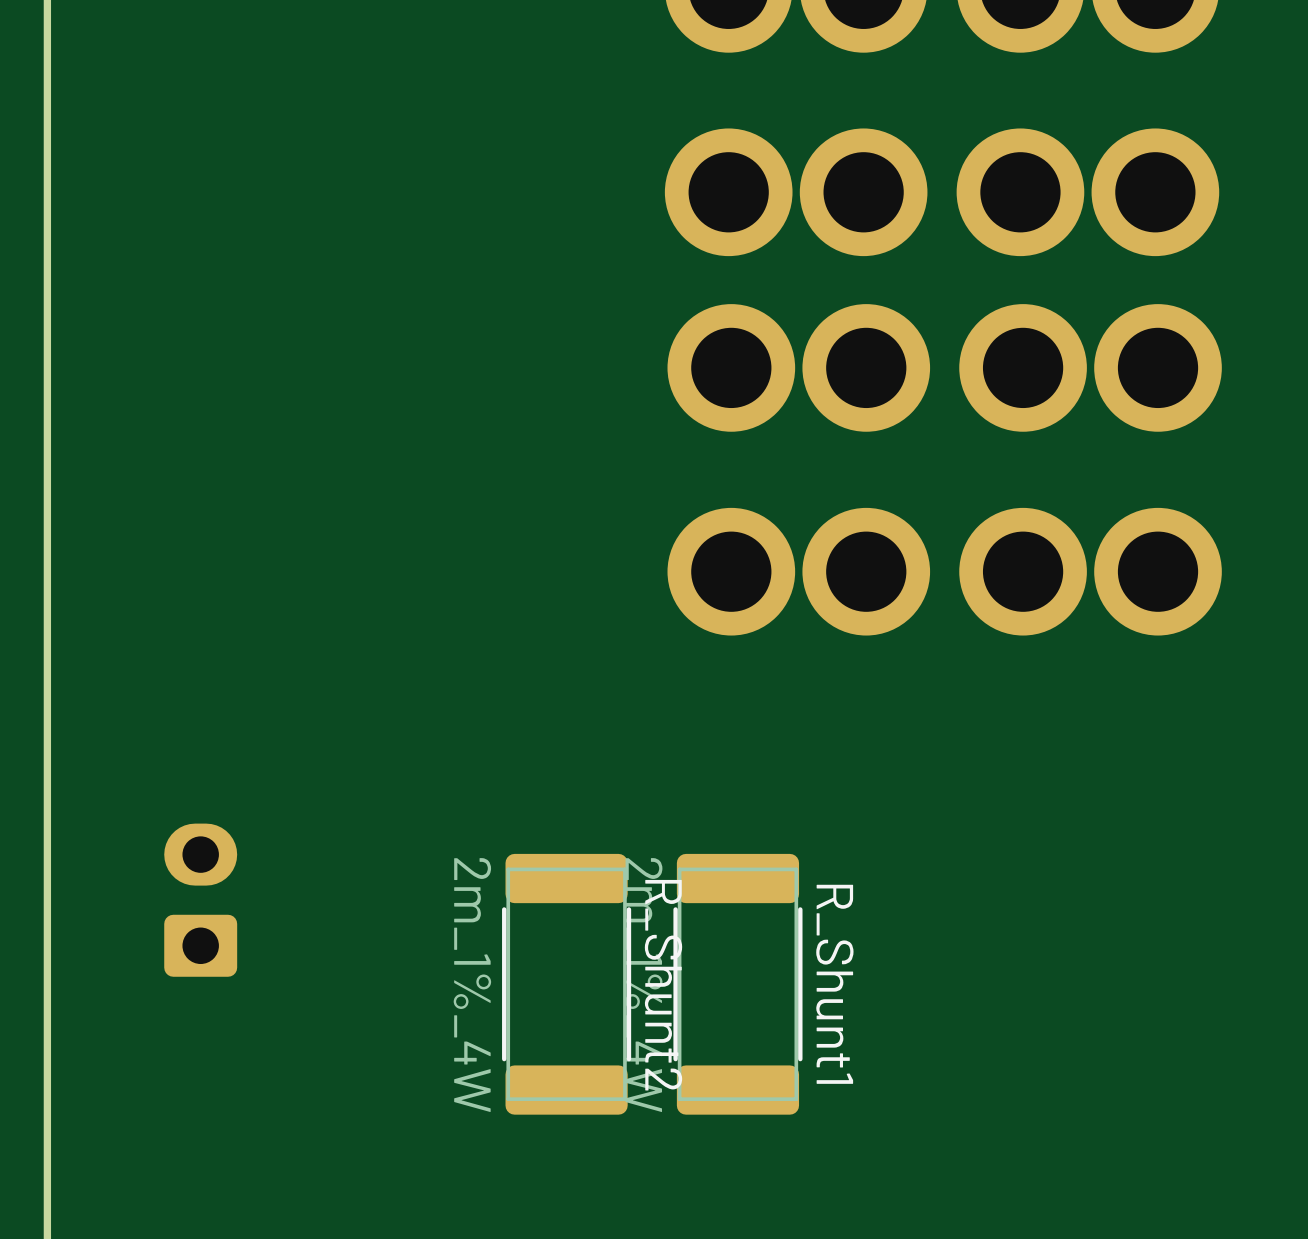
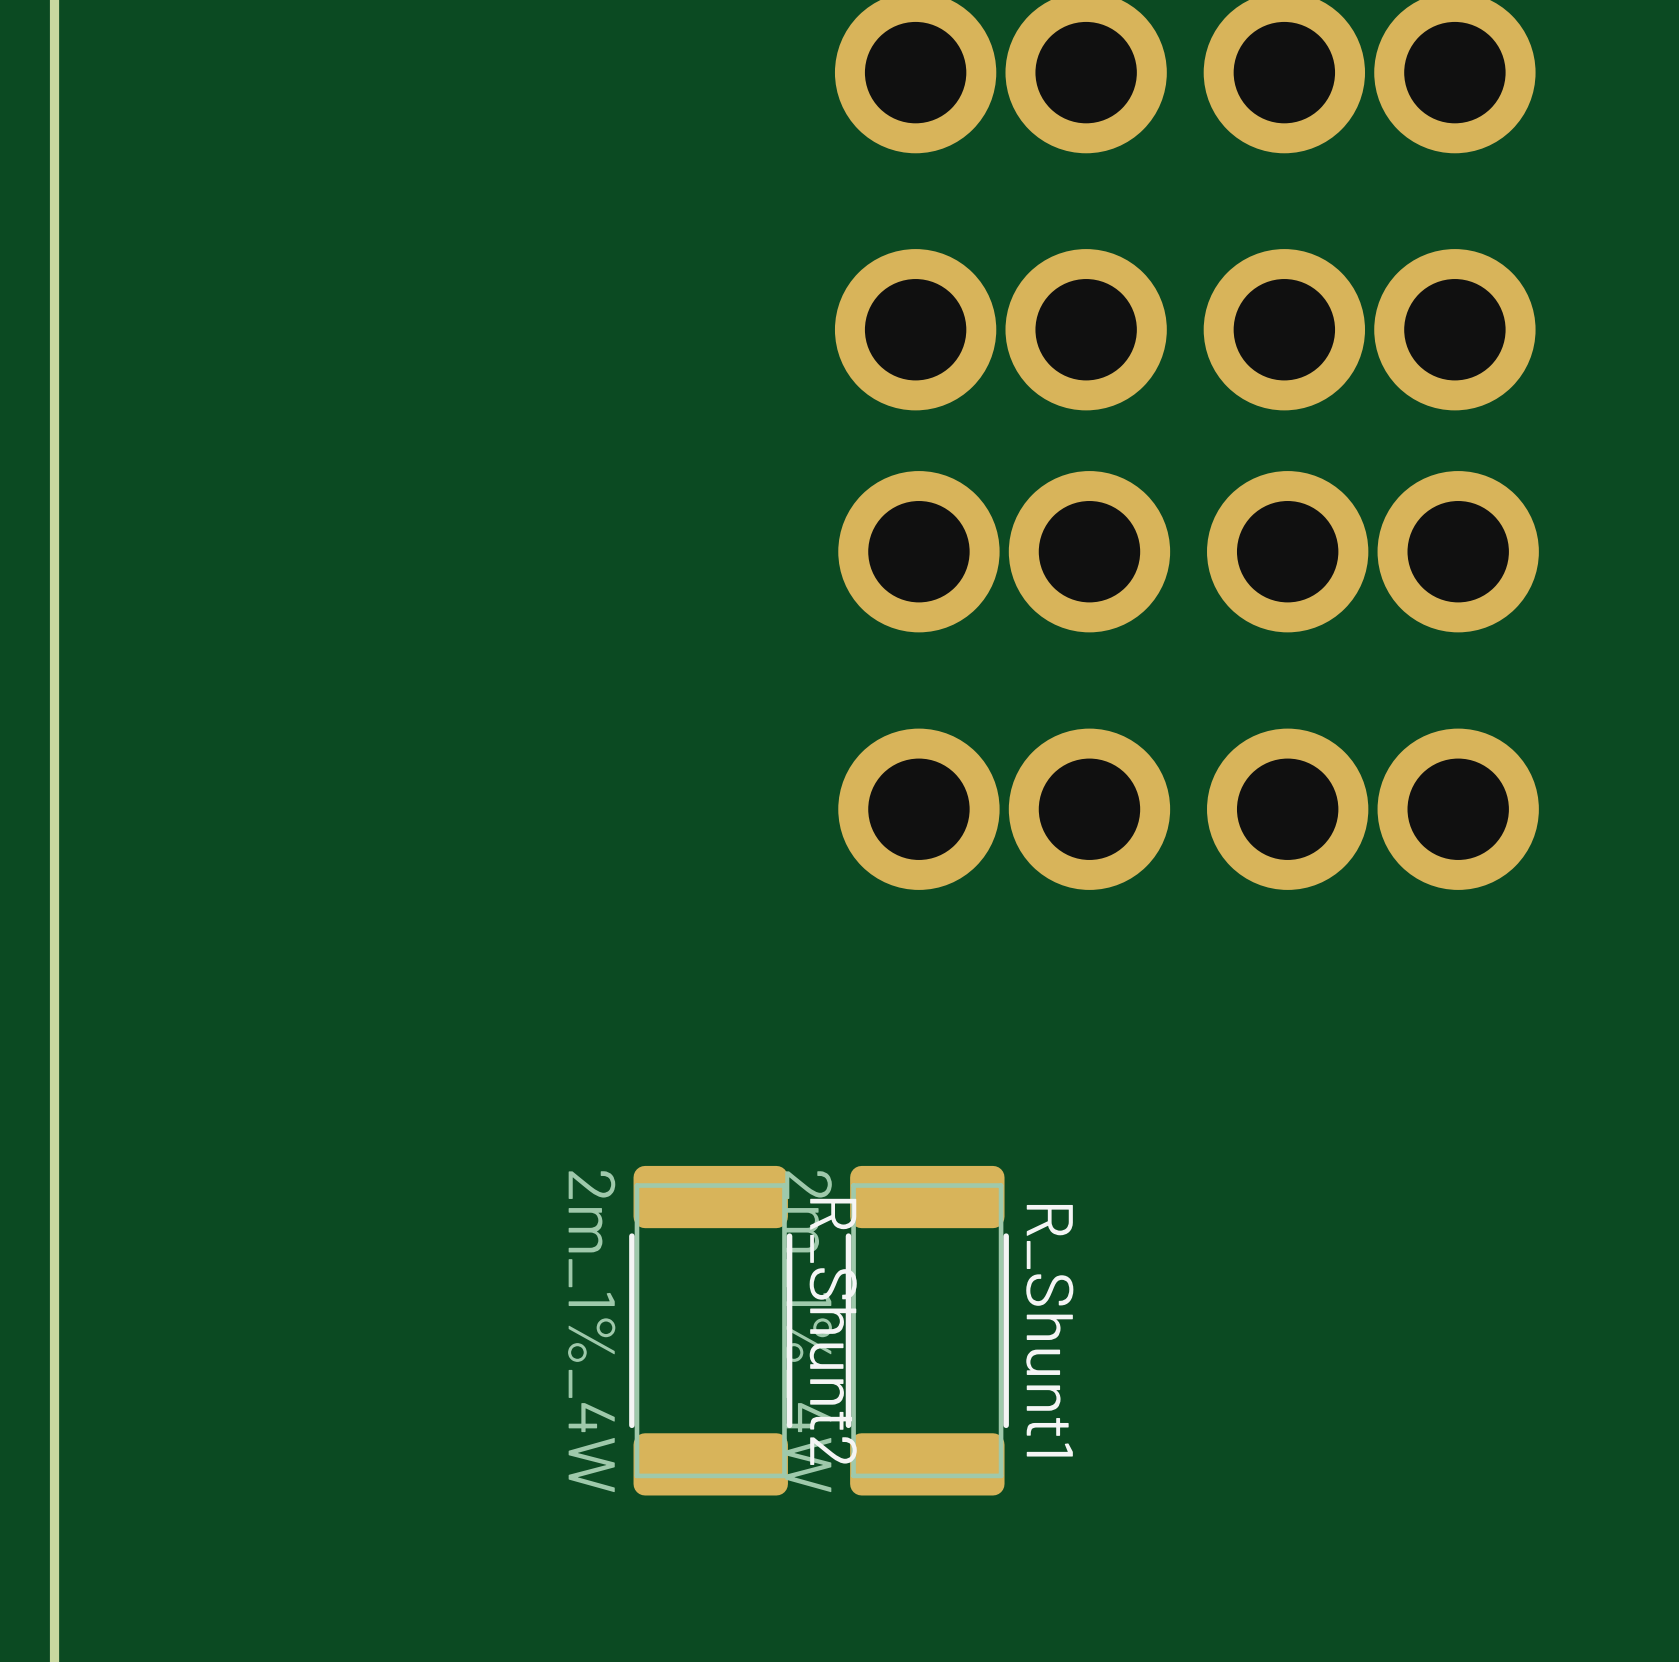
part: (200, 900) -> none

